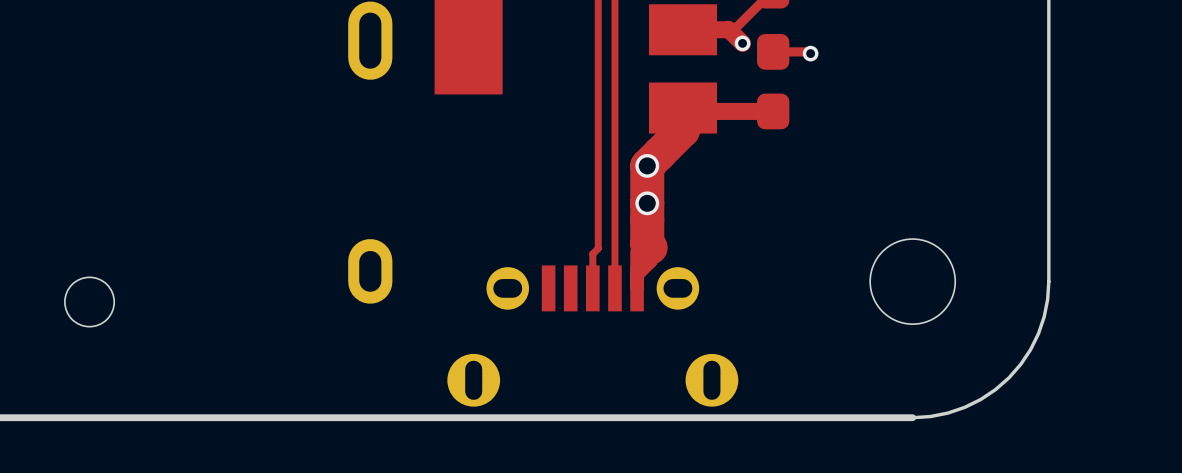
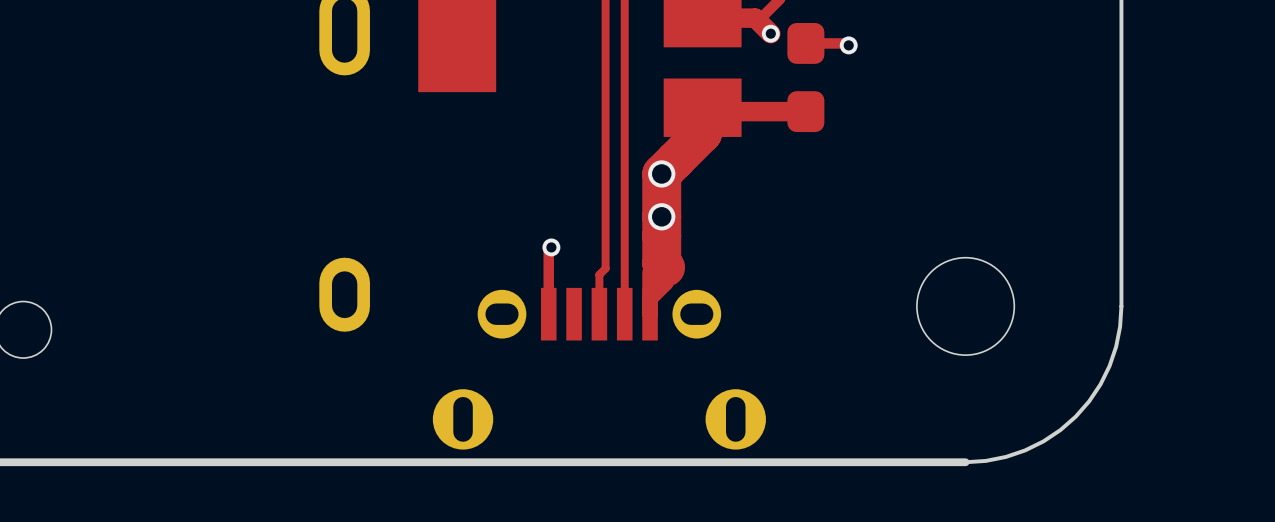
top track: none -> (551, 247) (548, 250) (548, 314)
via: none -> (551, 247)

